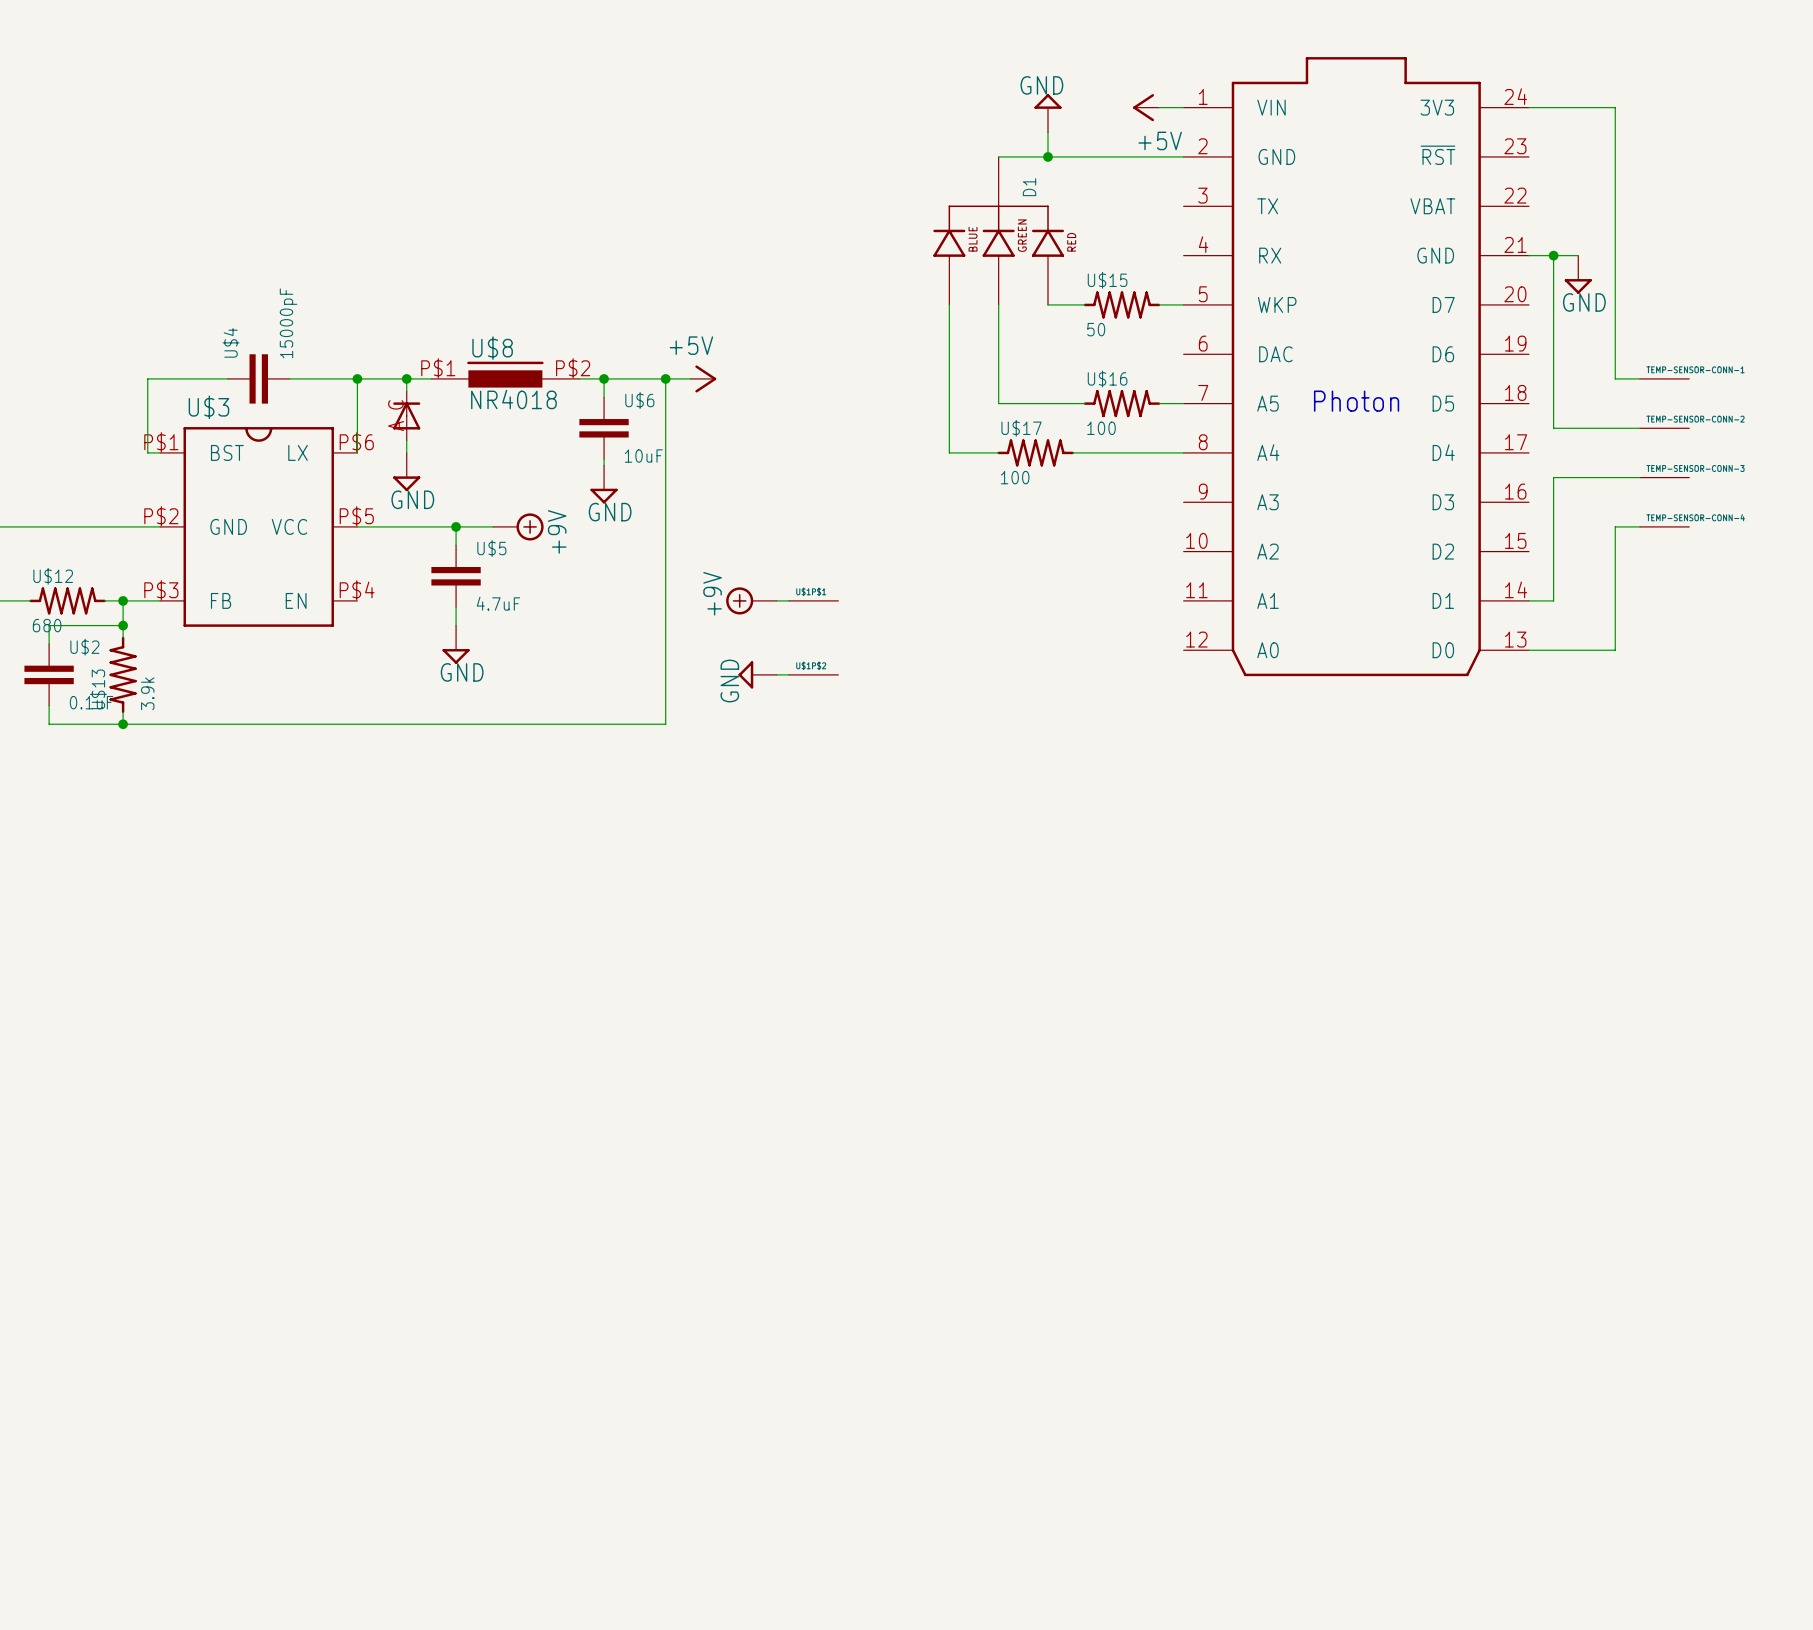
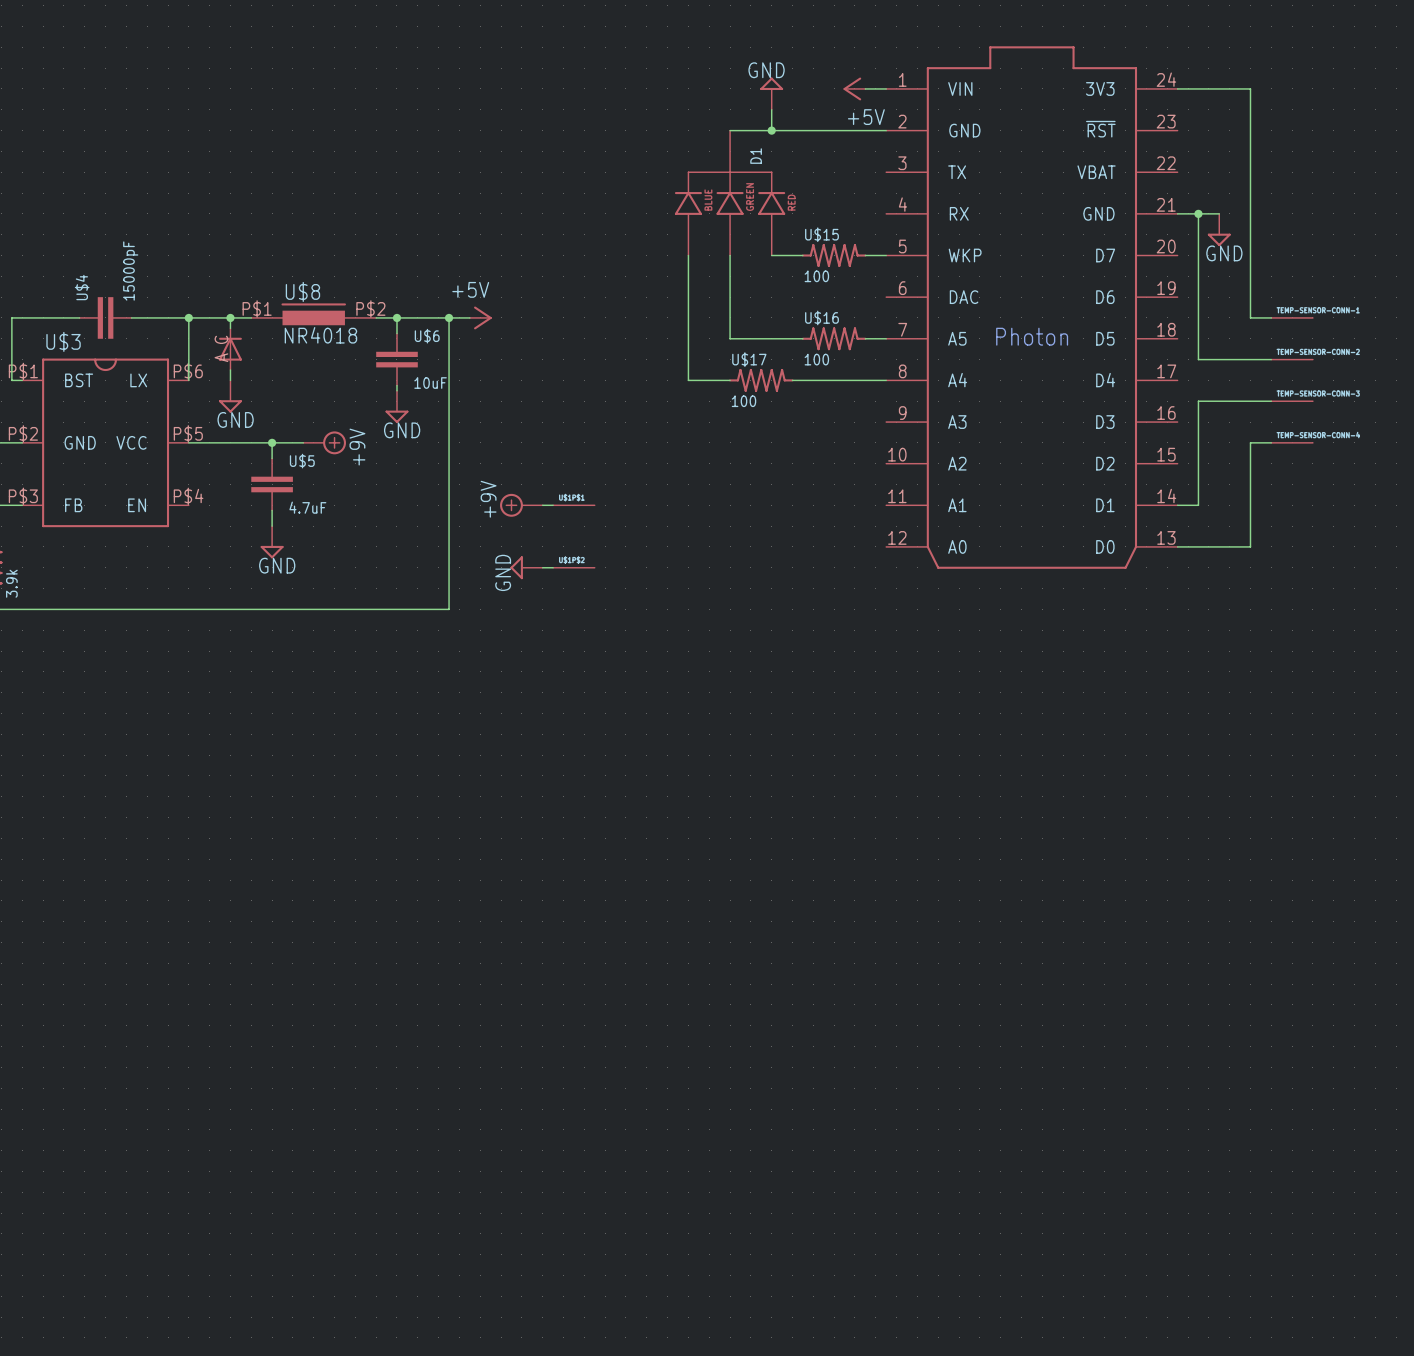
U$15 value: 50 (1096, 329) -> 100 (816, 276)

